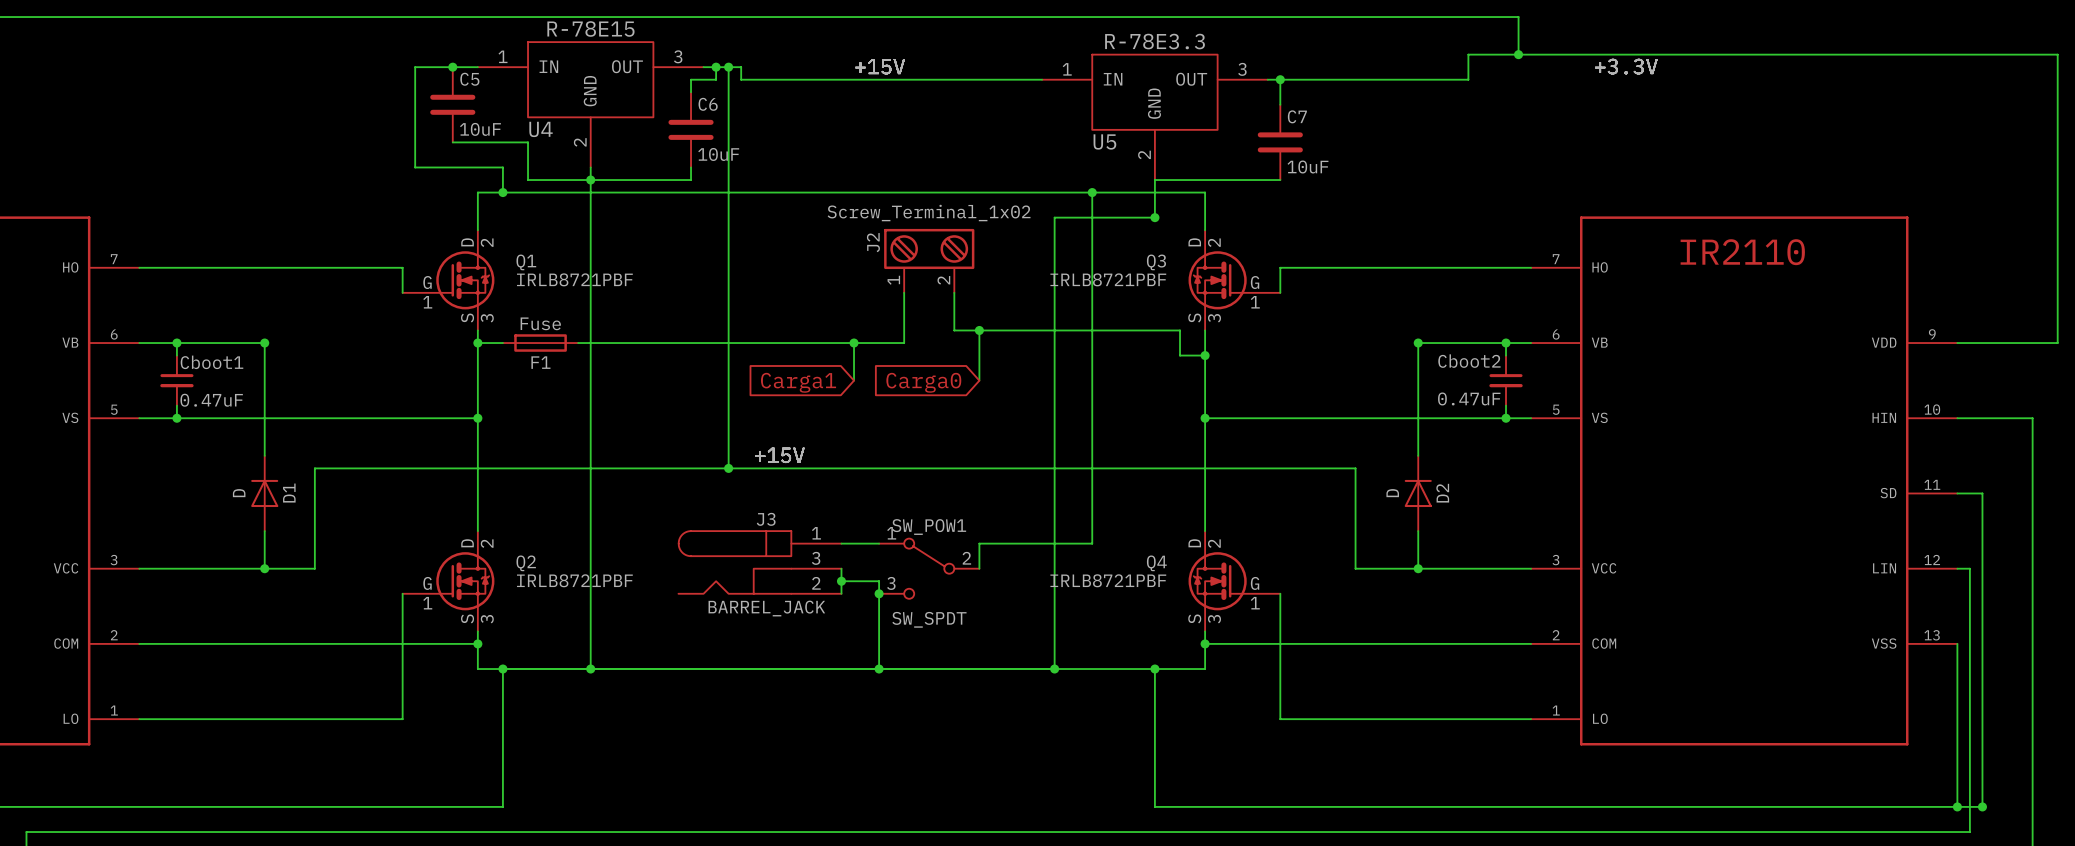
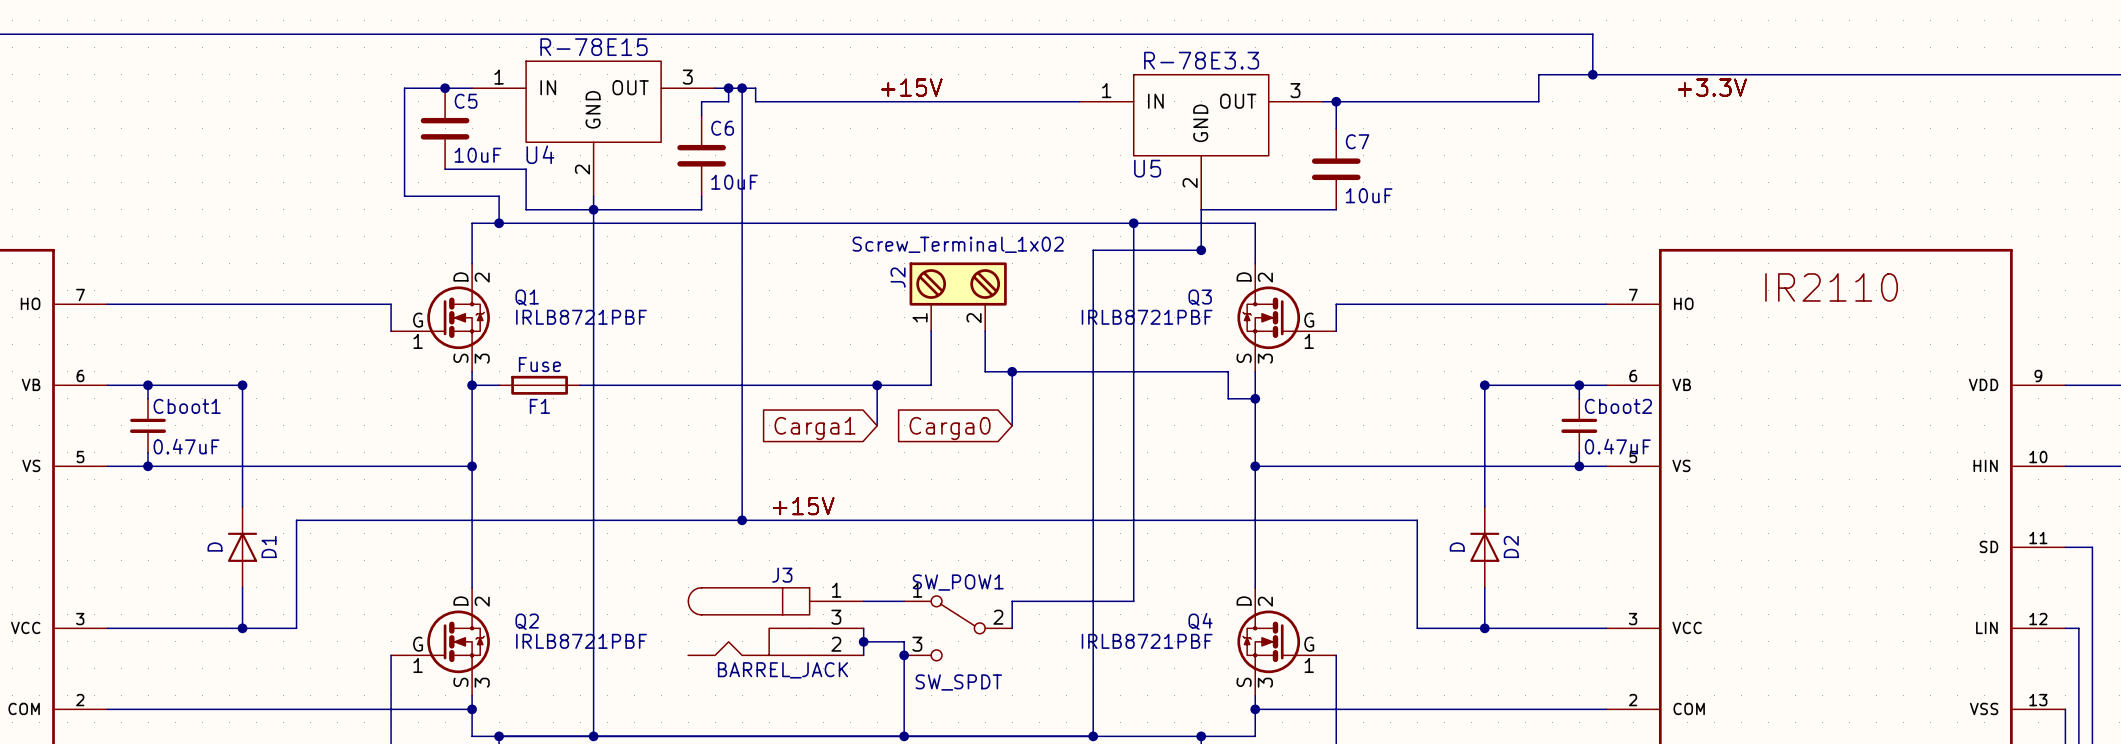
Cboot2 name position: Cboot2 (1469, 361) -> Cboot2 (1618, 406)
Cboot2 value position: 0.47uF (1469, 398) -> 0.47uF (1617, 446)

